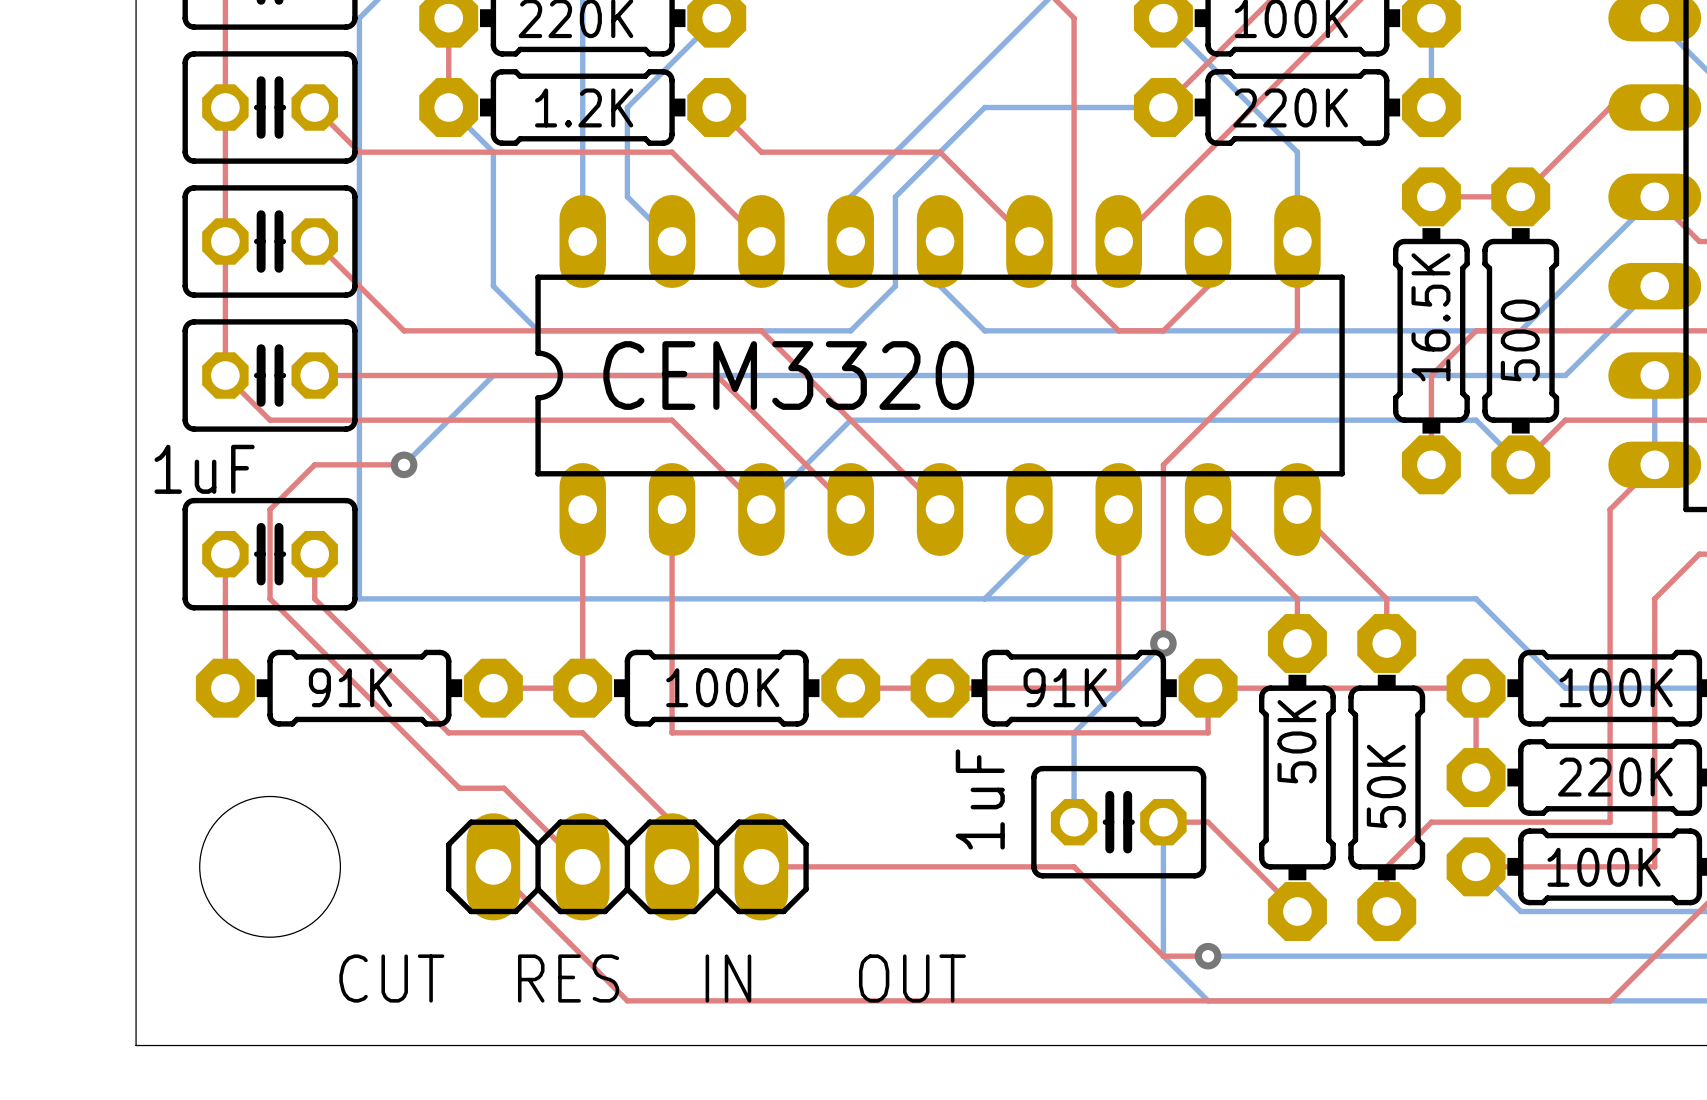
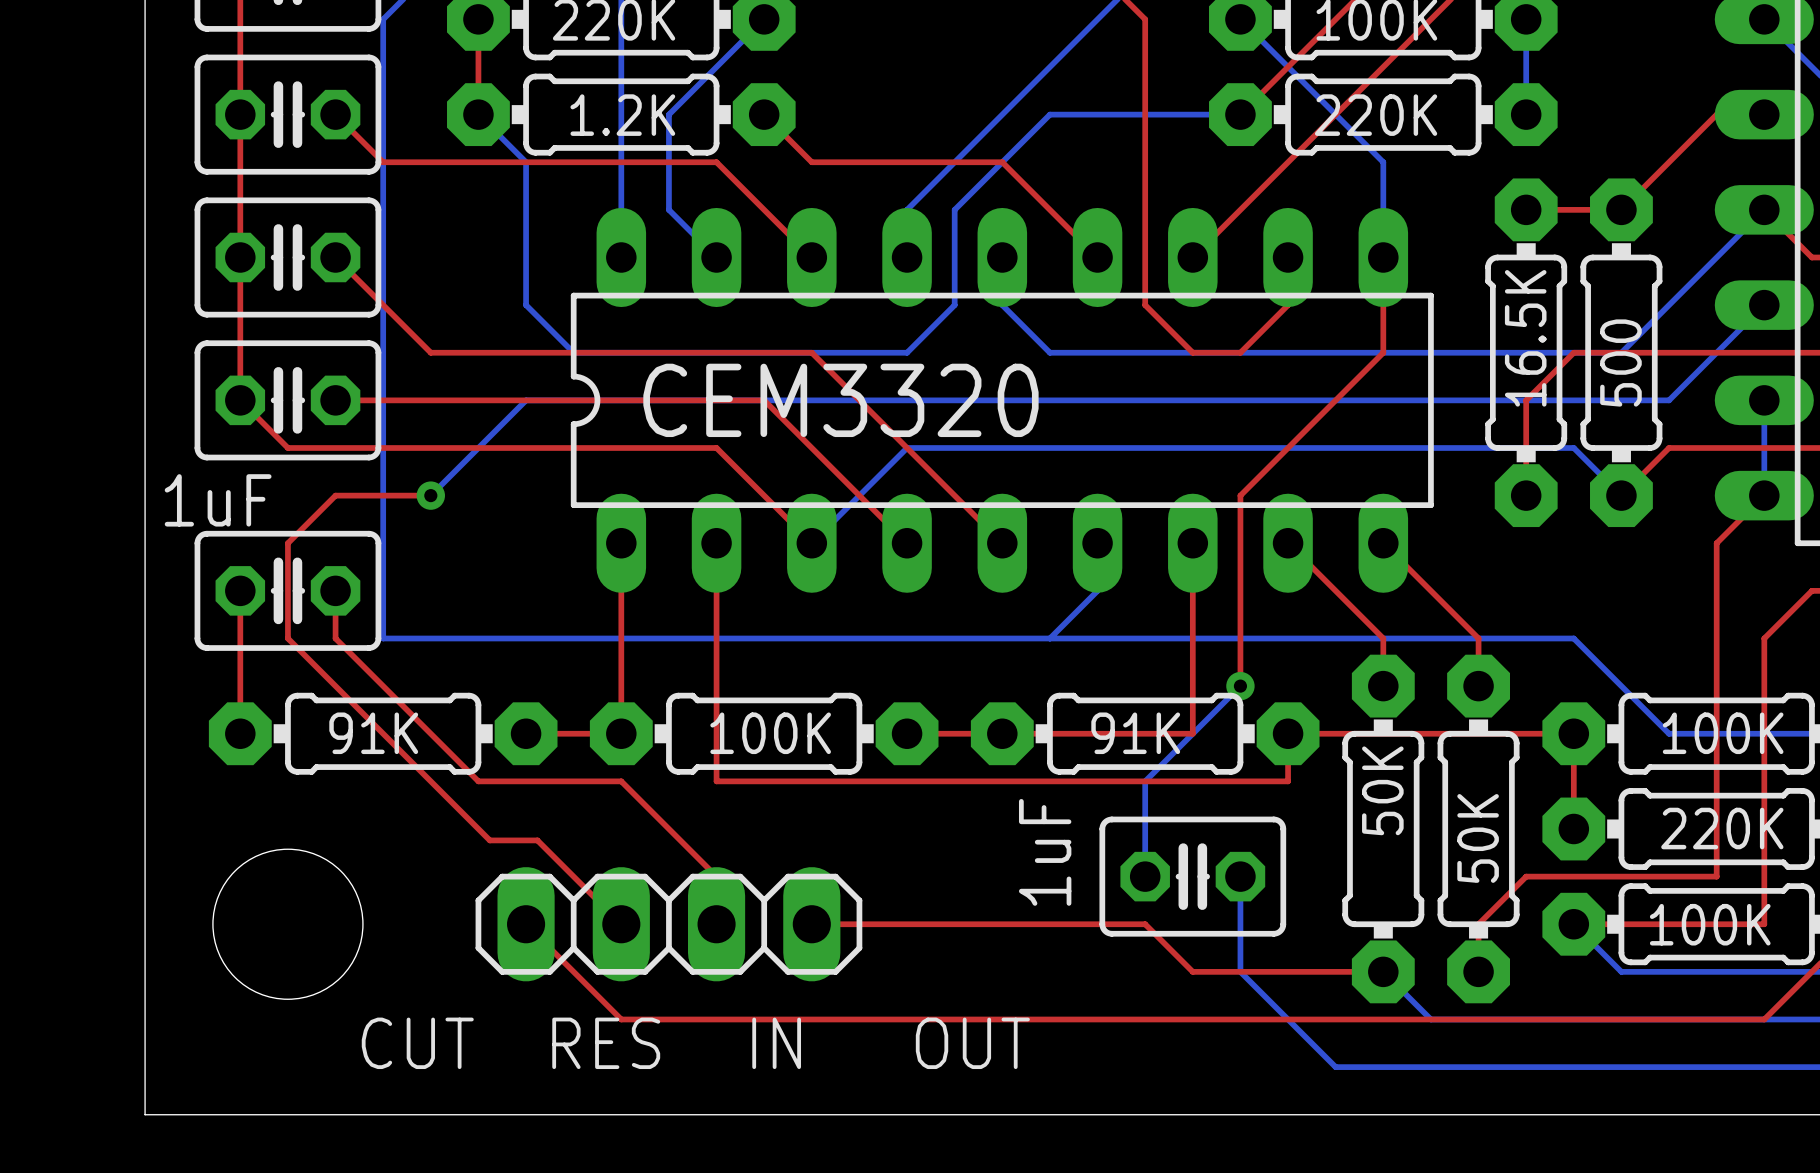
top track: (1163, 822) (1208, 822) (1297, 911) -> (1192, 971) (1383, 971)
top track: (1118, 911) (1163, 956) -> none
bottom track: (1163, 911) (1163, 956) (1208, 1000) (1252, 1000) -> (1240, 971) (1335, 1067)
top track: (582, 956) (627, 1000) (1610, 1000) (1654, 956) -> (621, 1019) (1240, 1019)
top track: none -> (1288, 1019) (1764, 1019)
bottom track: (1208, 956) (1342, 956) -> (1383, 971) (1430, 1019)
via: (1208, 956) -> none

